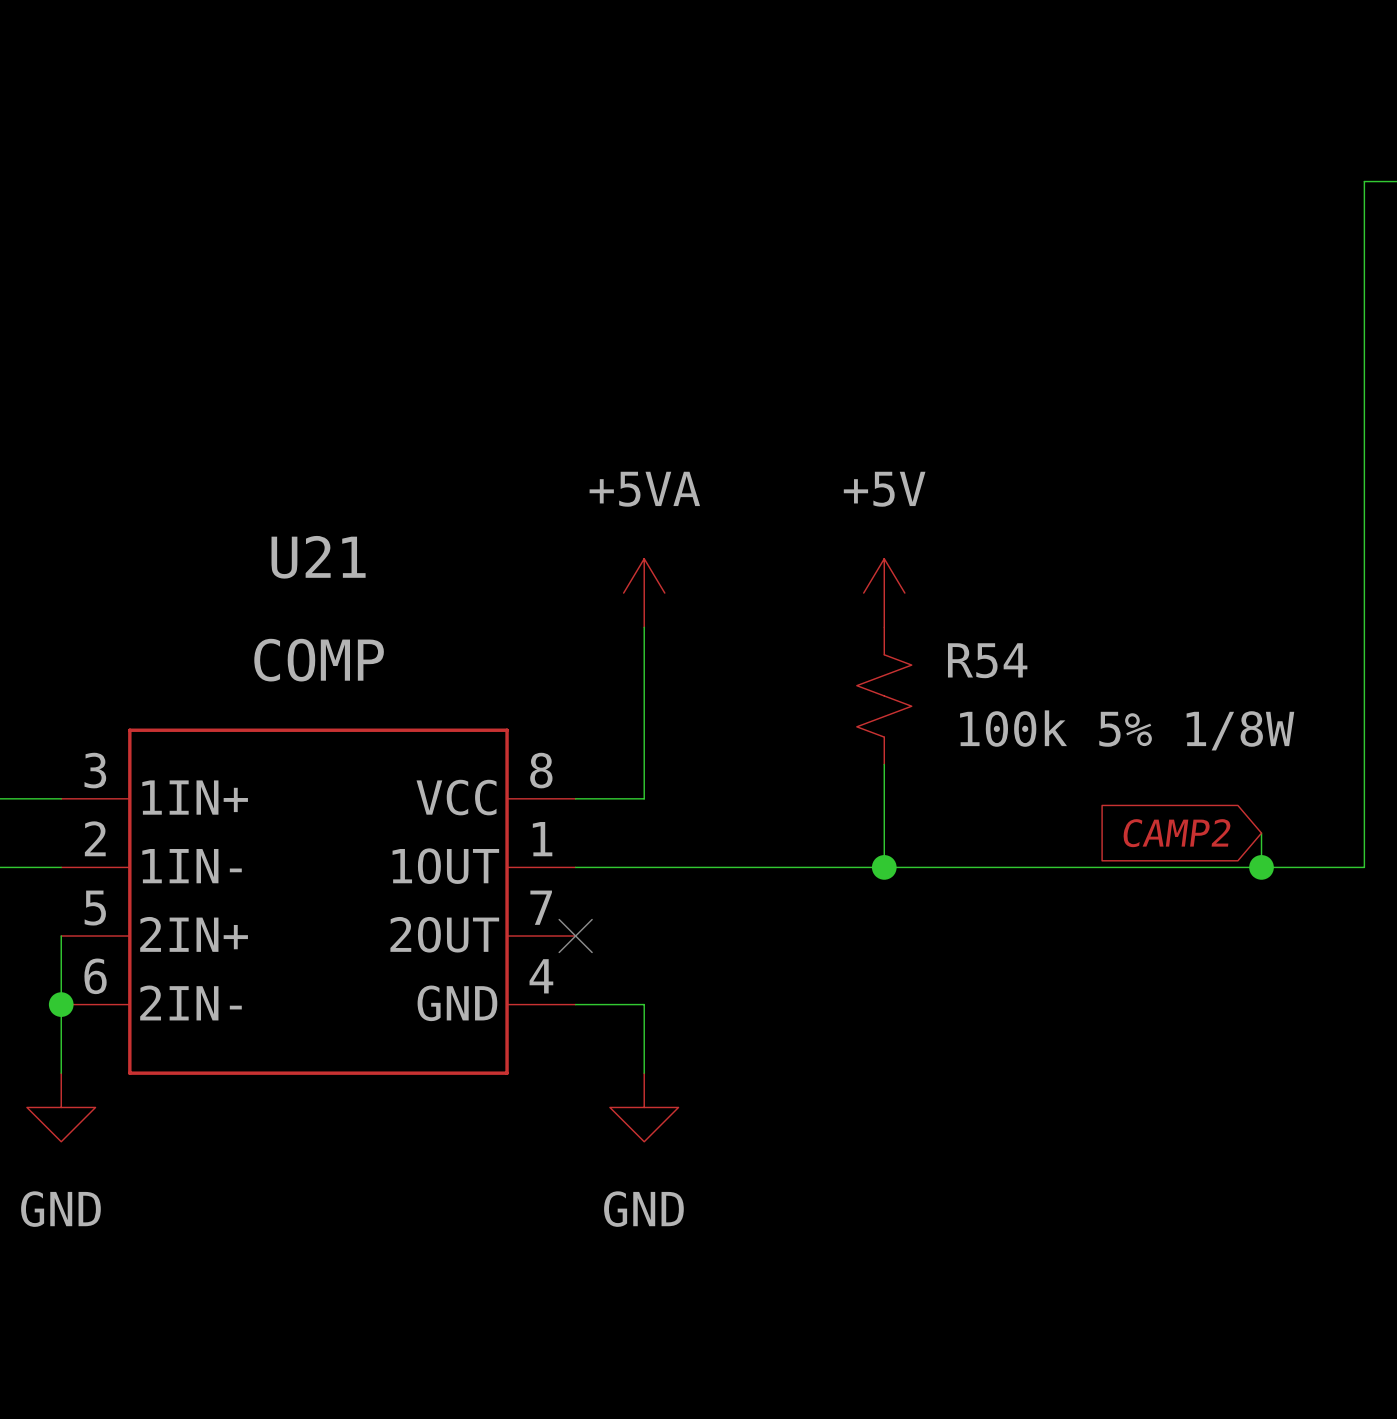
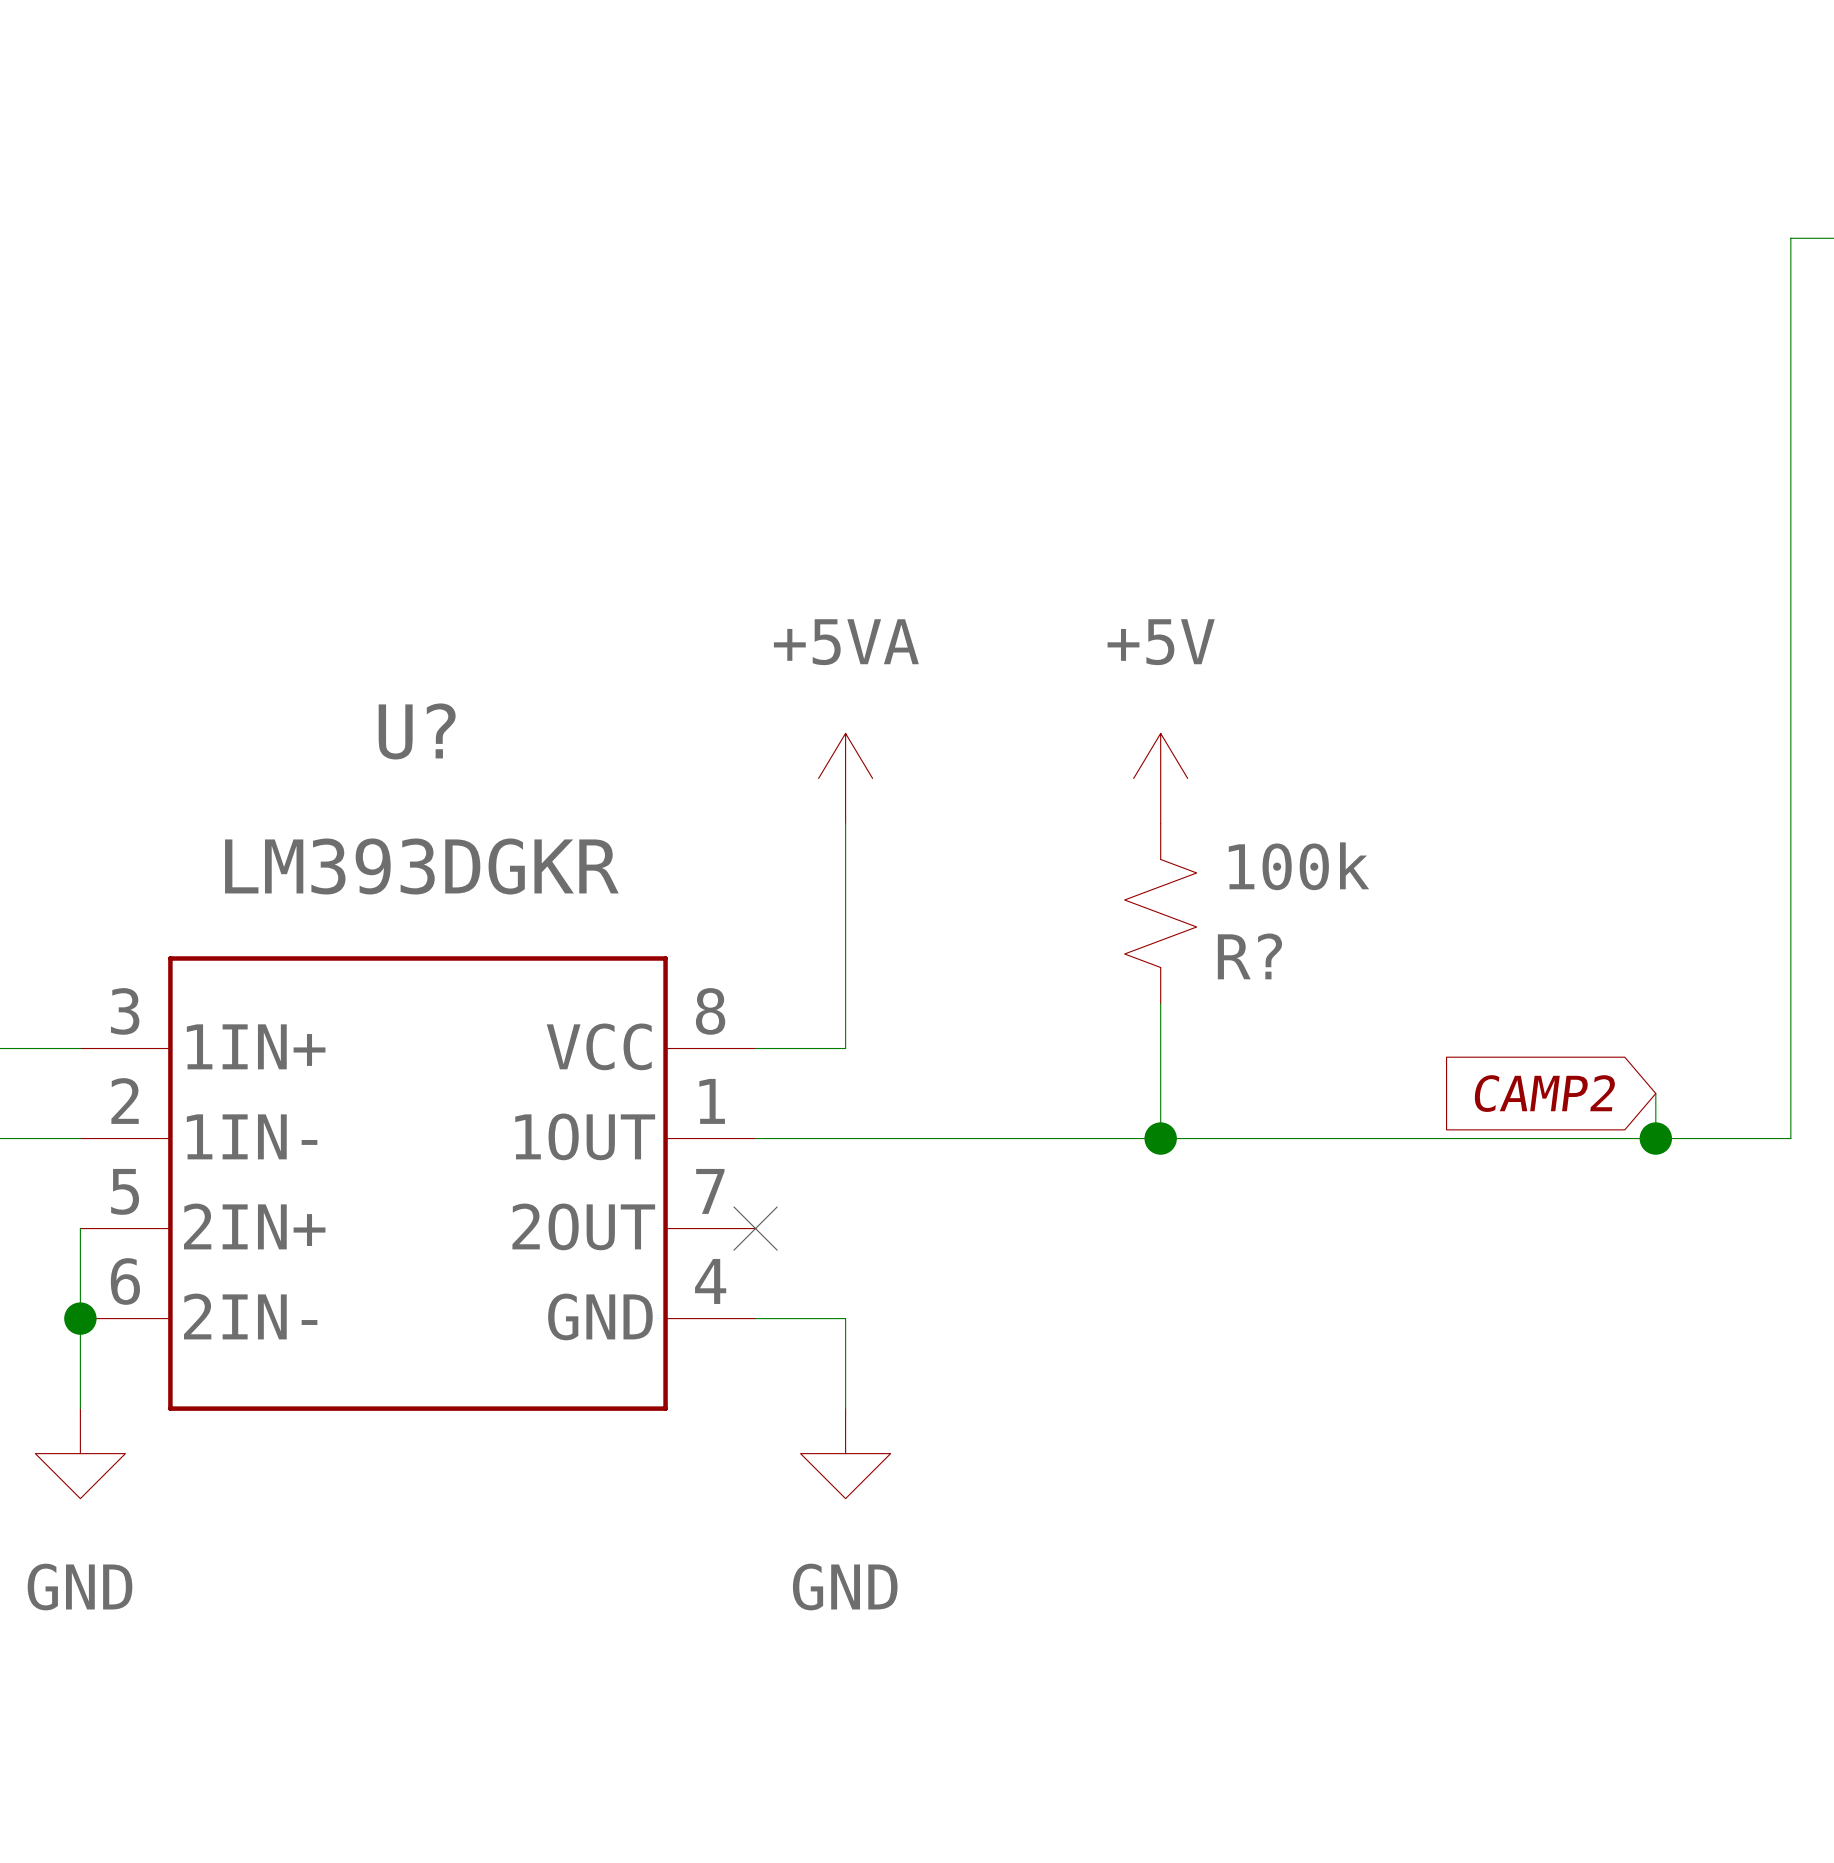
U21 name: U21 (318, 557) -> U? (417, 731)
U21 value: COMP (319, 660) -> LM393DGKR (421, 866)
R54 name: R54 (987, 660) -> R? (1249, 956)
R54 value: 100k 5% 1/8W (1127, 730) -> 100k (1298, 866)

